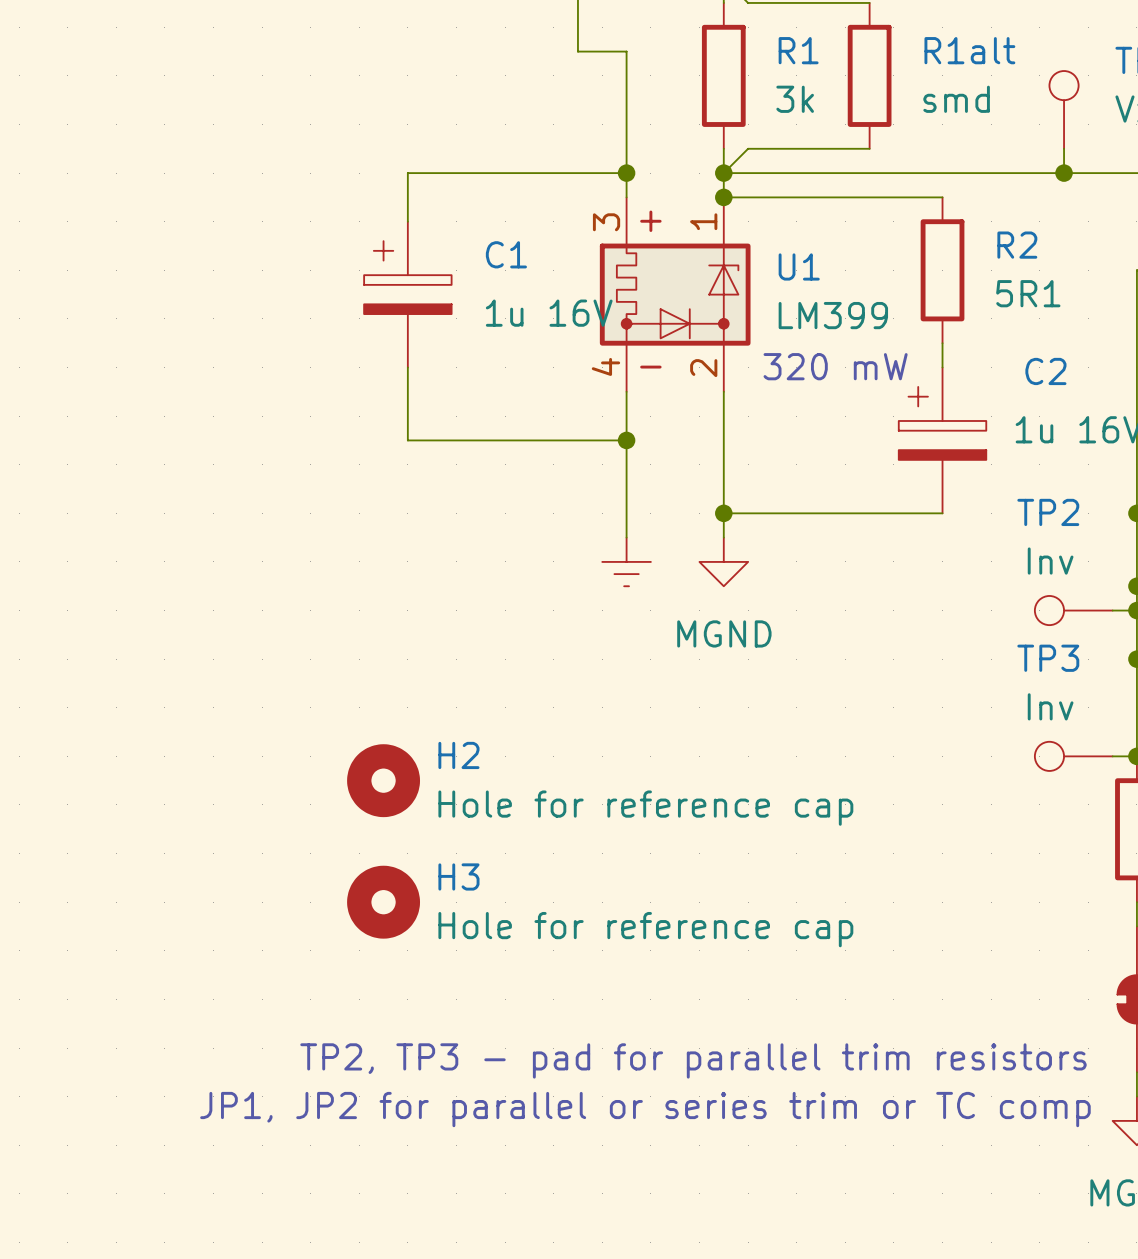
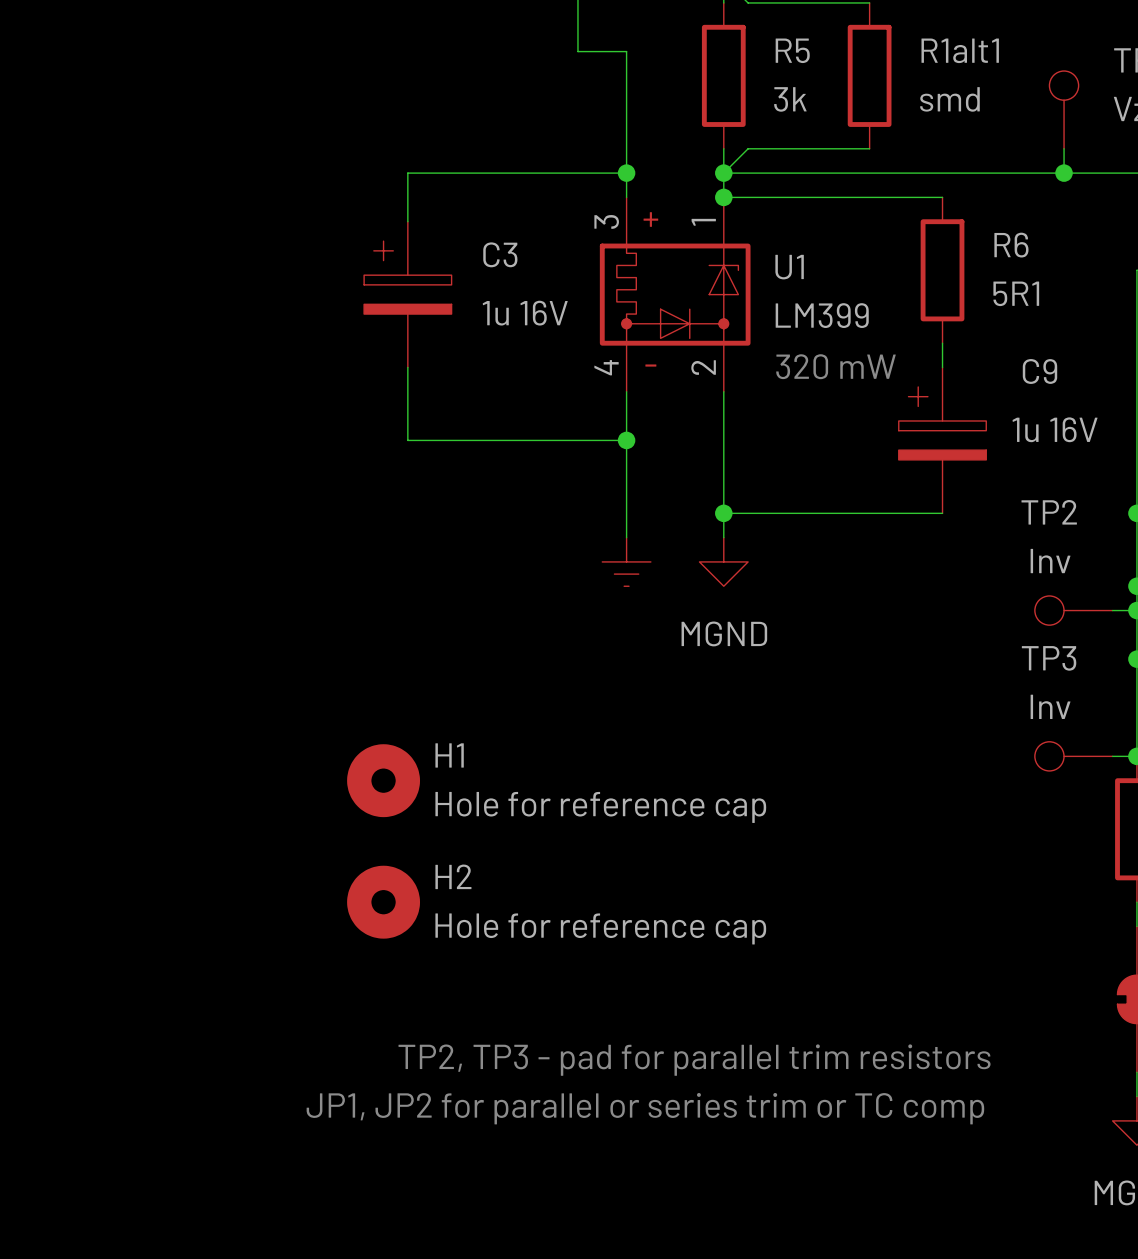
R1 name: R1 (798, 50) -> R5 (792, 50)
R1alt name: R1alt (969, 50) -> R1alt1 (960, 50)
R2 name: R2 (1017, 245) -> R6 (1011, 245)
C1 name: C1 (506, 254) -> C3 (500, 254)
C2 name: C2 (1045, 371) -> C9 (1039, 371)
H2 name: H2 (458, 755) -> H1 (449, 755)
H3 name: H3 (458, 876) -> H2 (453, 876)

